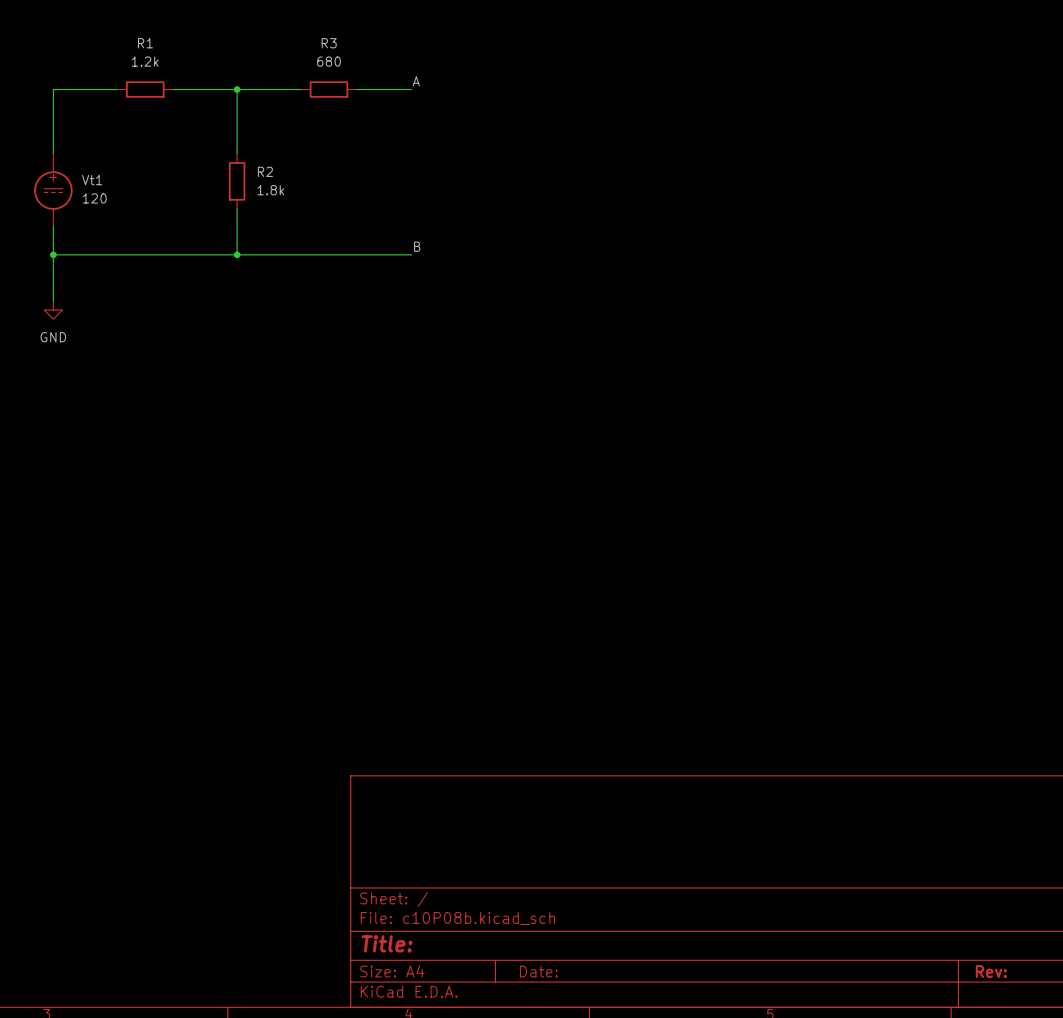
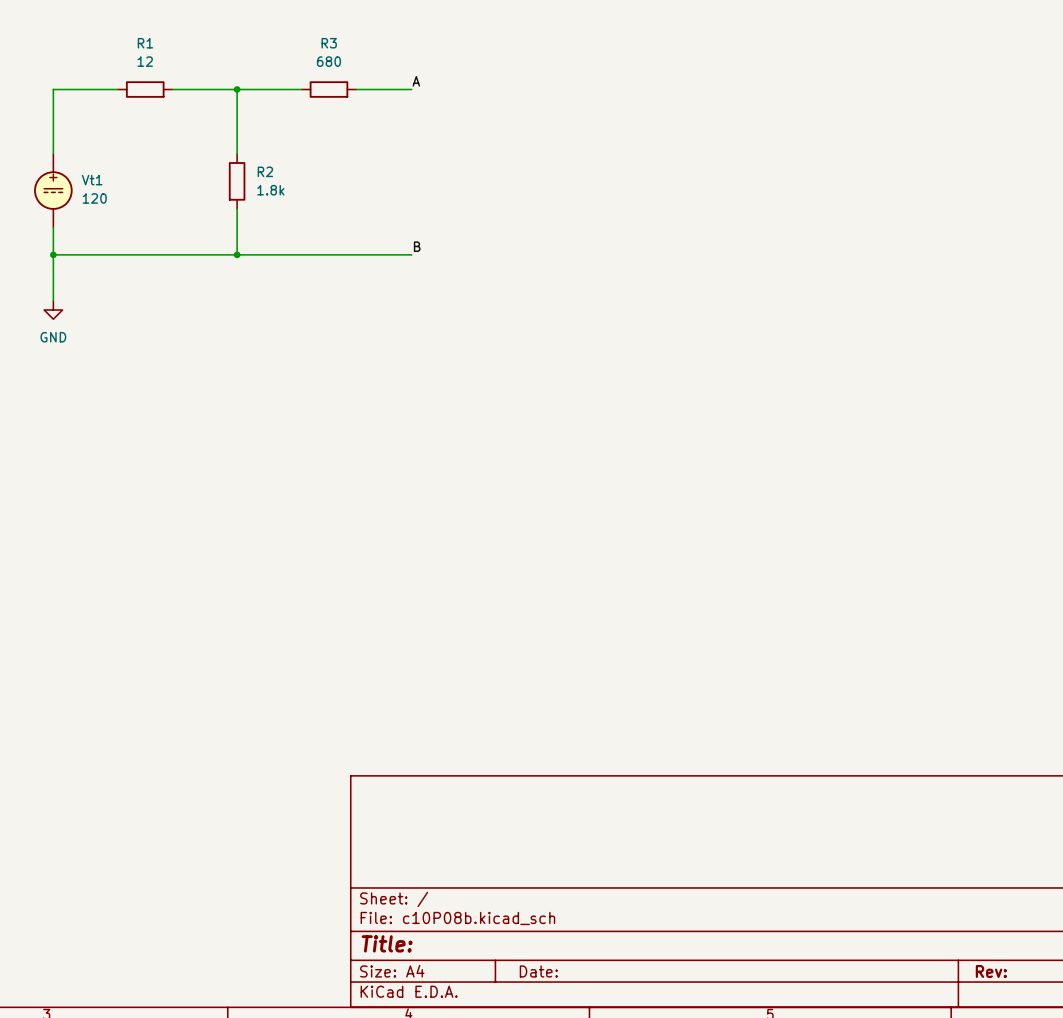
R1 value: 1.2k (145, 61) -> 12 (145, 61)

